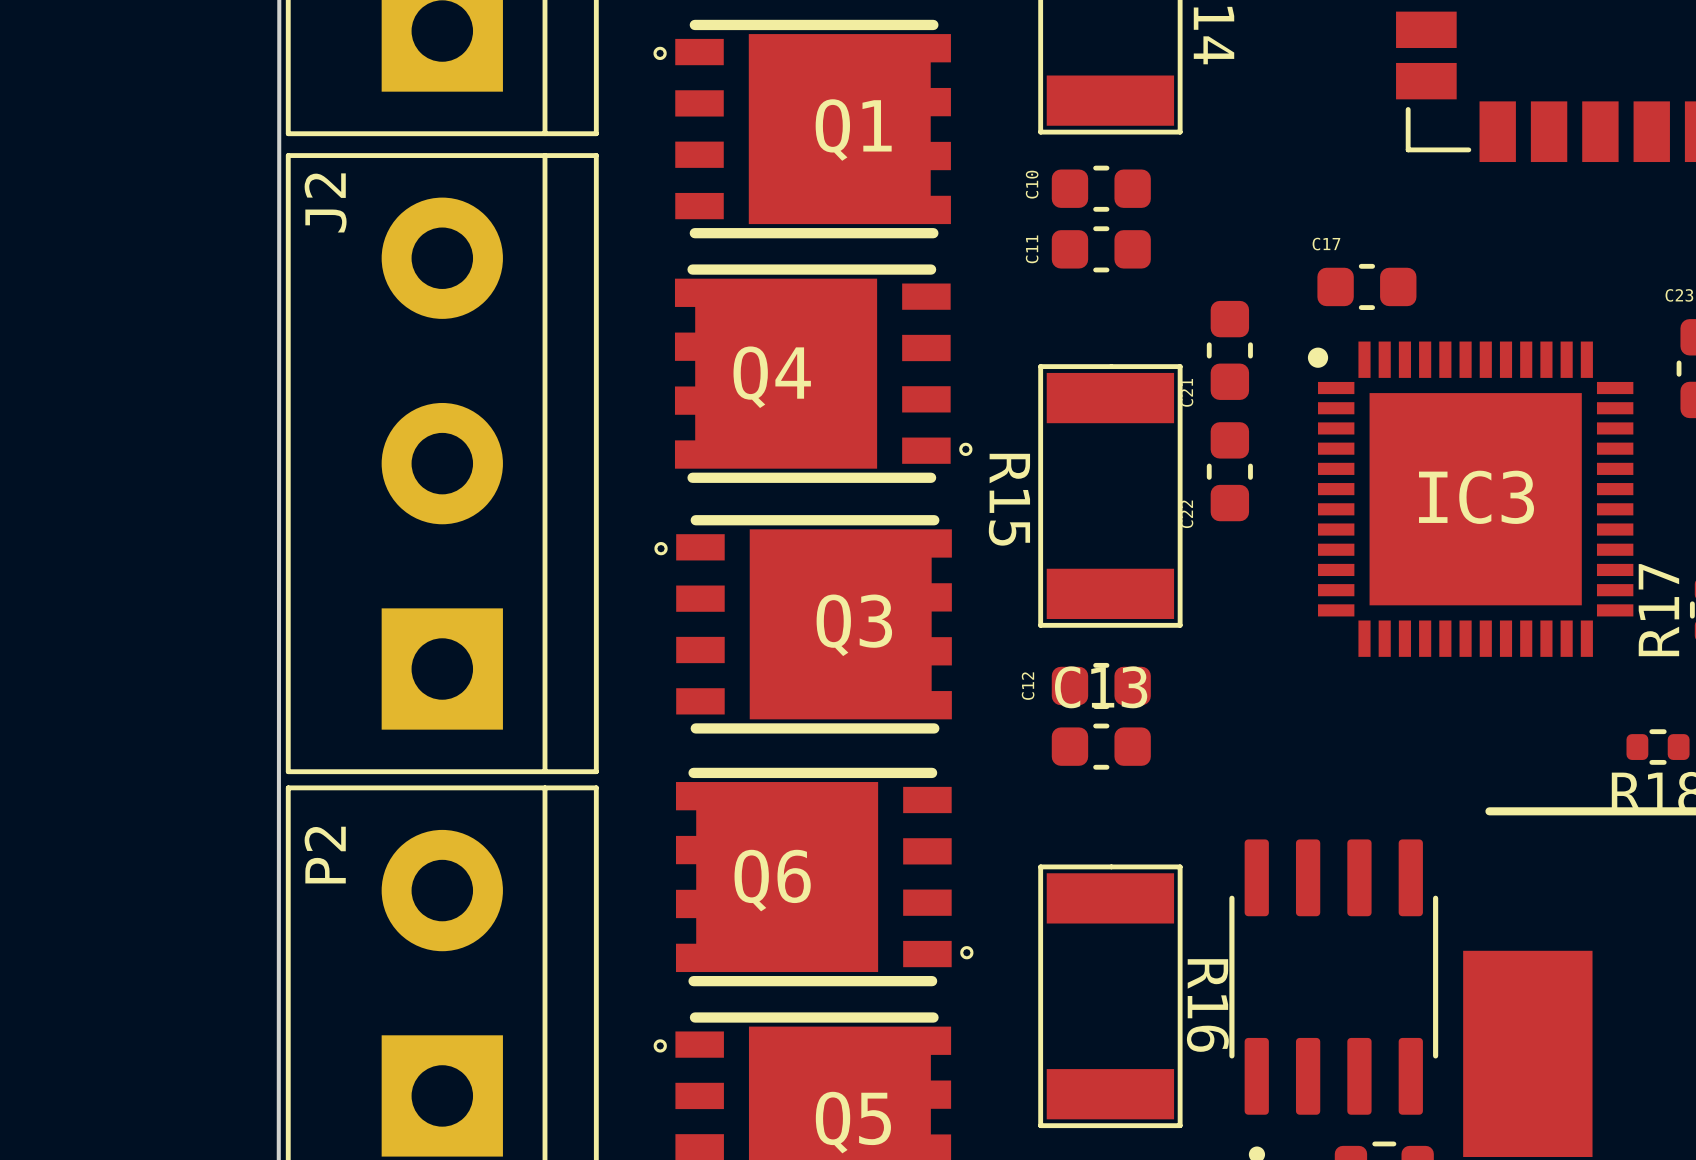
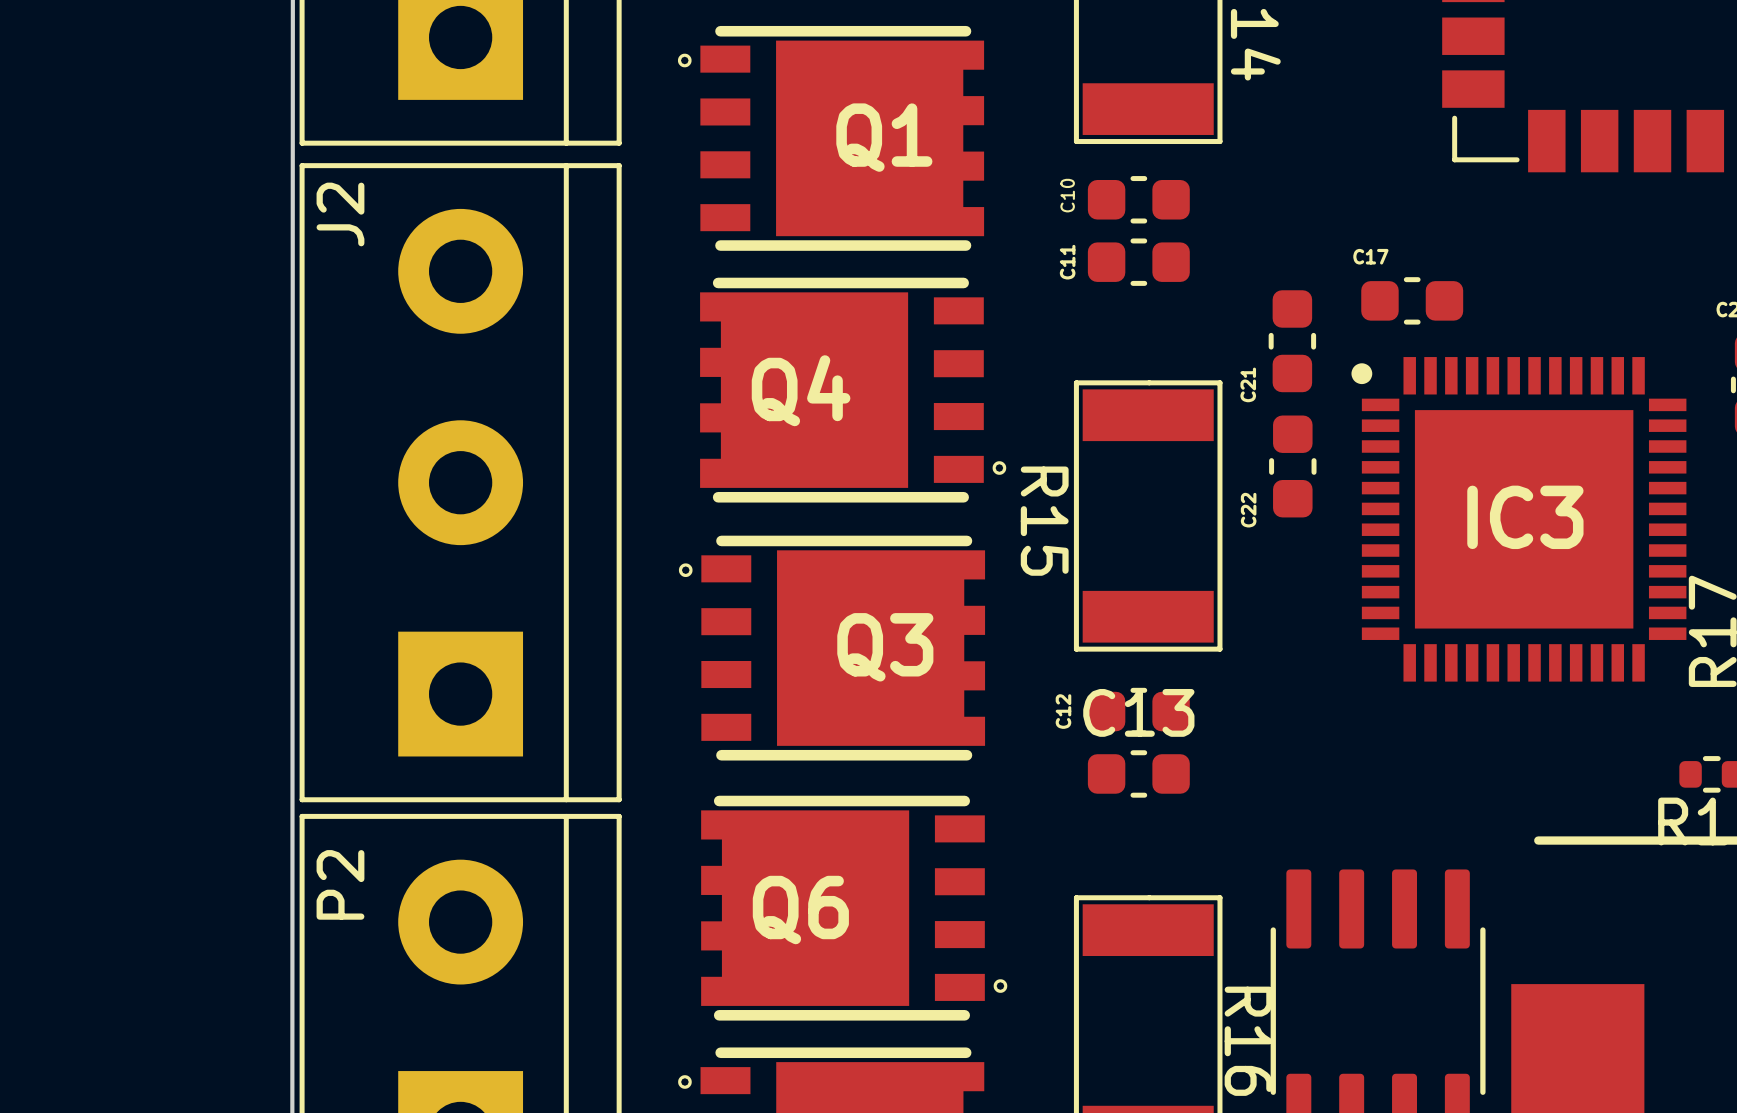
C21 position: (1229, 350) -> (1292, 341)
C22 position: (1229, 471) -> (1292, 466)

